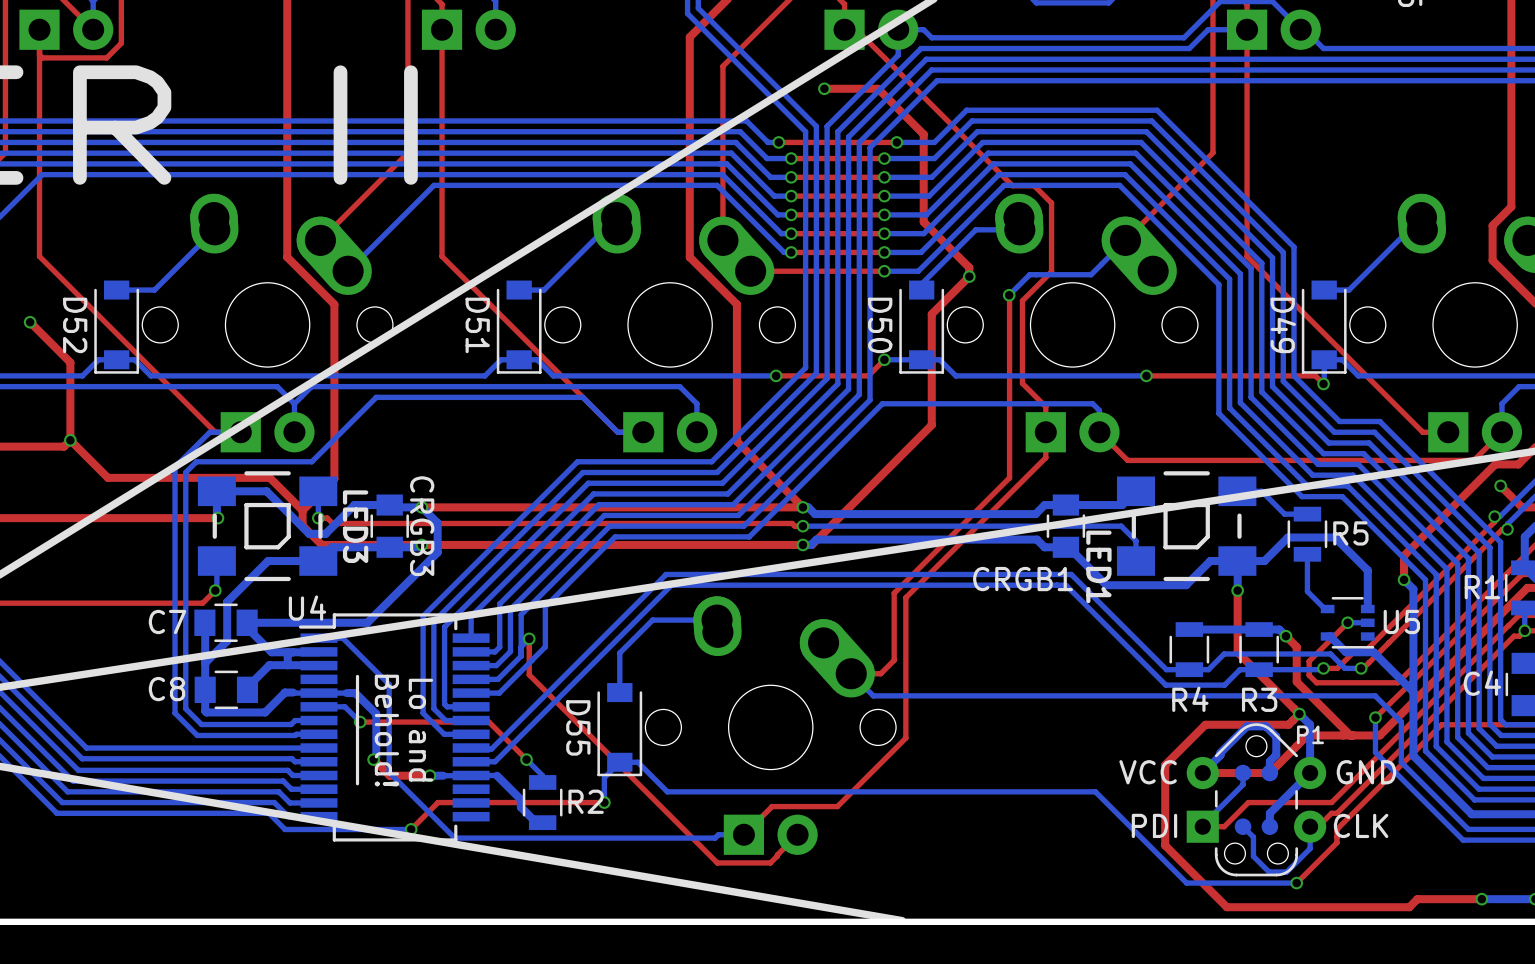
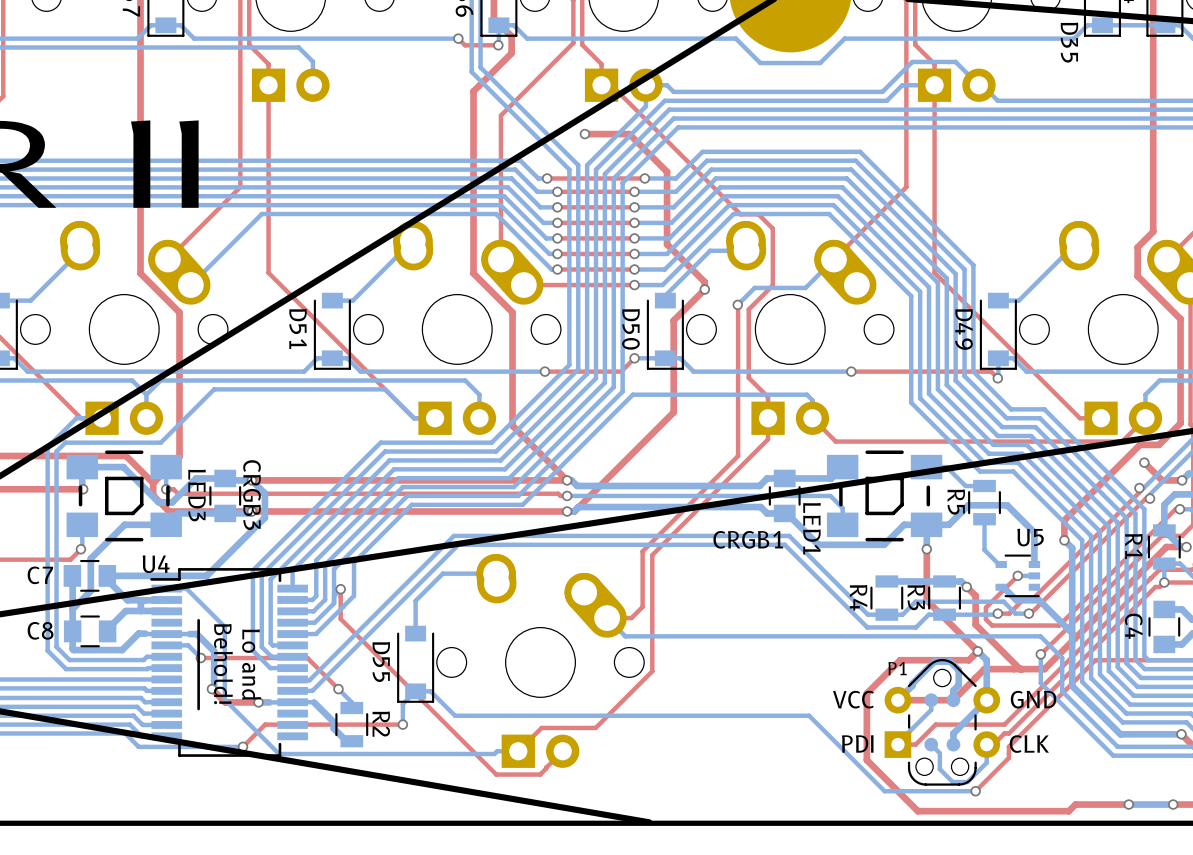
R5 name rotation: 0° (1350, 533) -> 90° clockwise (956, 502)
R5 name position: R5 (1350, 533) -> R5 (956, 502)
R1 name rotation: 0° (1482, 587) -> 90° clockwise (1133, 546)
U5 name position: U5 (1401, 621) -> U5 (1030, 537)
C4 name rotation: 0° (1482, 683) -> 90° clockwise (1133, 626)
R4 name rotation: 0° (1190, 699) -> 90° clockwise (858, 597)
R4 name position: R4 (1190, 699) -> R4 (858, 597)
R3 name rotation: 0° (1259, 699) -> 90° clockwise (916, 597)
R3 name position: R3 (1259, 699) -> R3 (916, 597)
P1 name position: P1 (1310, 734) -> P1 (897, 668)
R2 name rotation: 0° (586, 801) -> 90° clockwise (381, 724)

